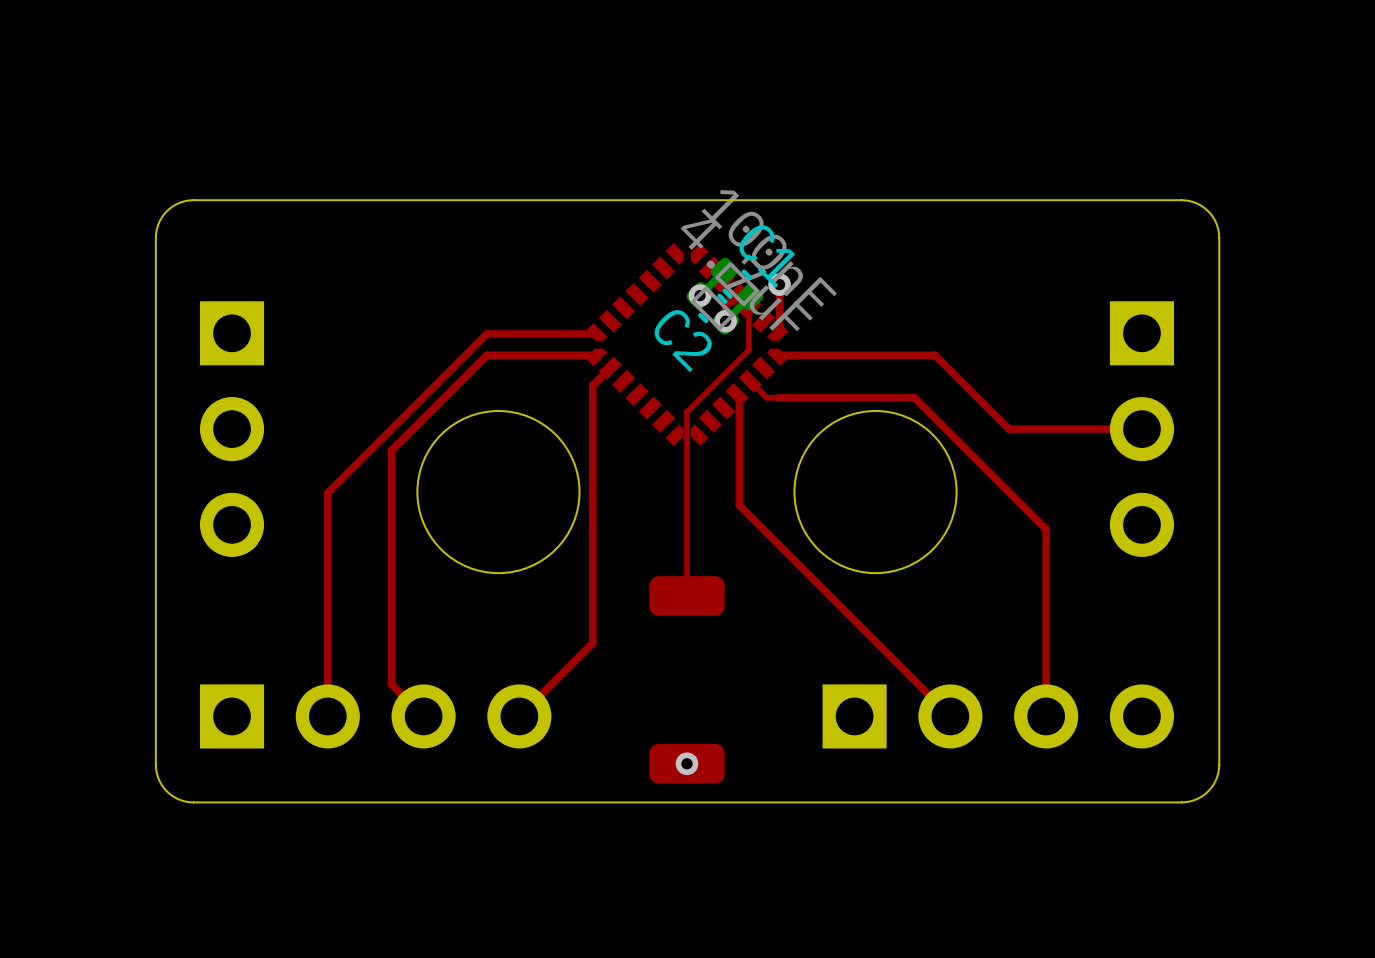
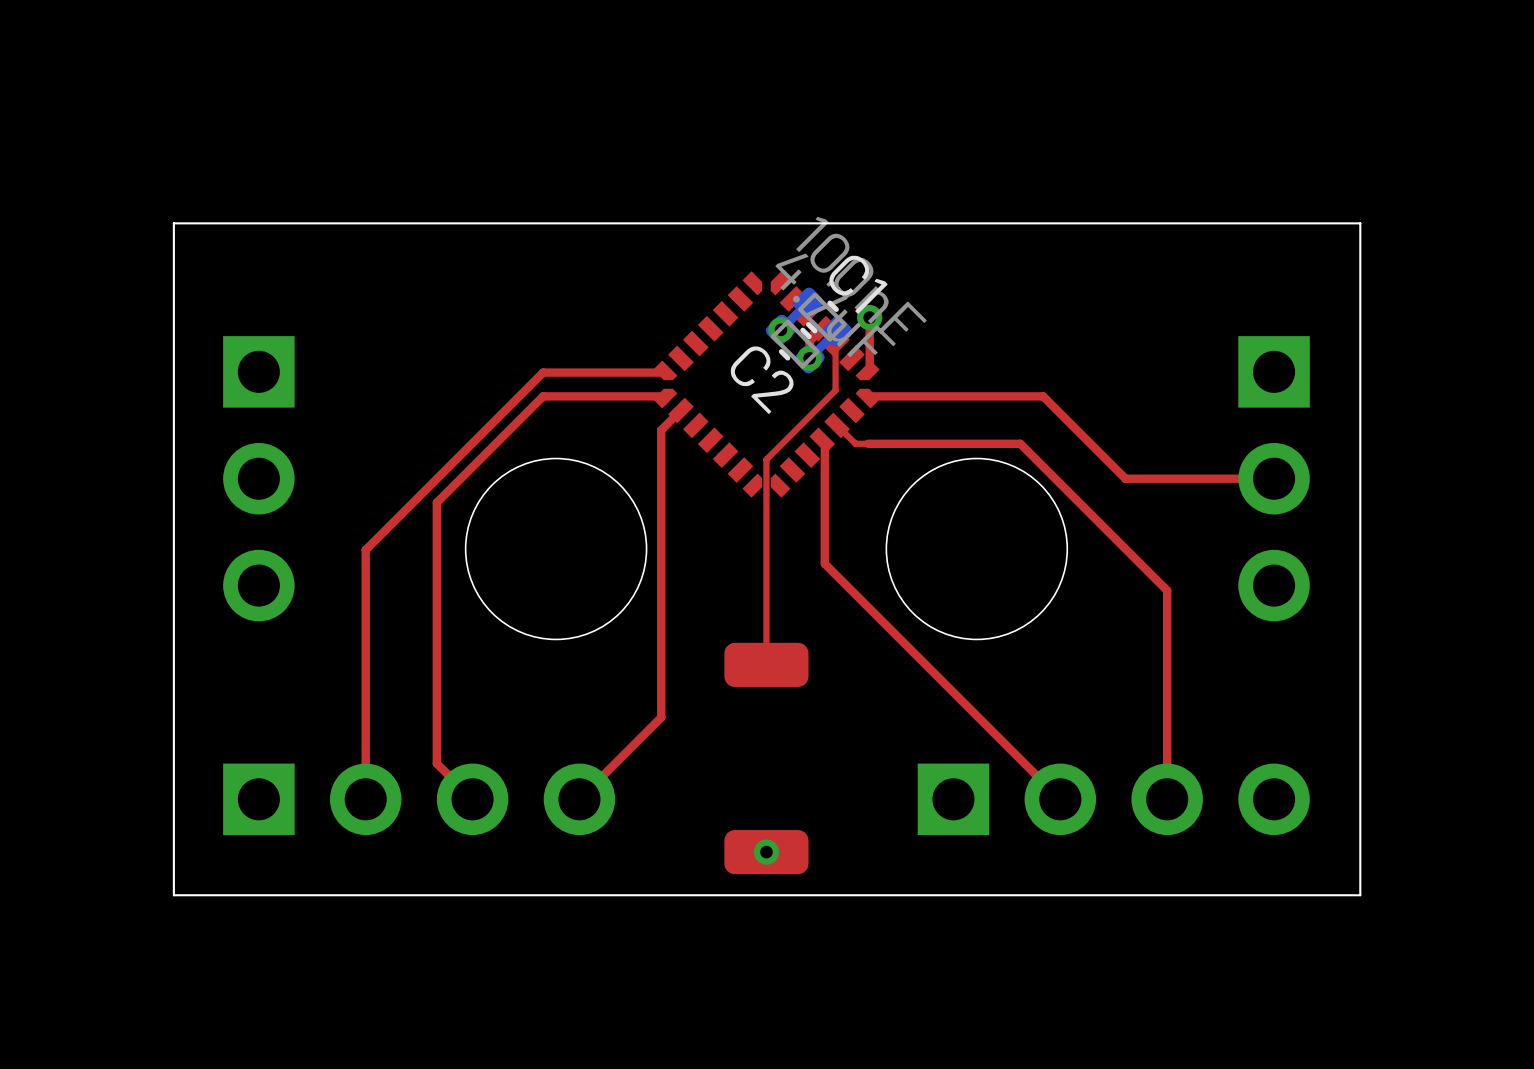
board edge: (193, 200) (181, 202) (166, 211) (157, 225) (155, 237) -> (215, 223) (173, 223) (173, 265)
board edge: (1181, 200) (1194, 202) (1208, 211) (1215, 221) (1219, 237) -> (1318, 223) (1360, 223) (1360, 265)
board edge: (155, 764) (157, 777) (166, 791) (181, 800) (193, 802) -> (173, 853) (173, 895) (215, 895)
board edge: (1219, 764) (1215, 781) (1208, 791) (1197, 798) (1181, 802) -> (1360, 853) (1360, 895) (1318, 895)

